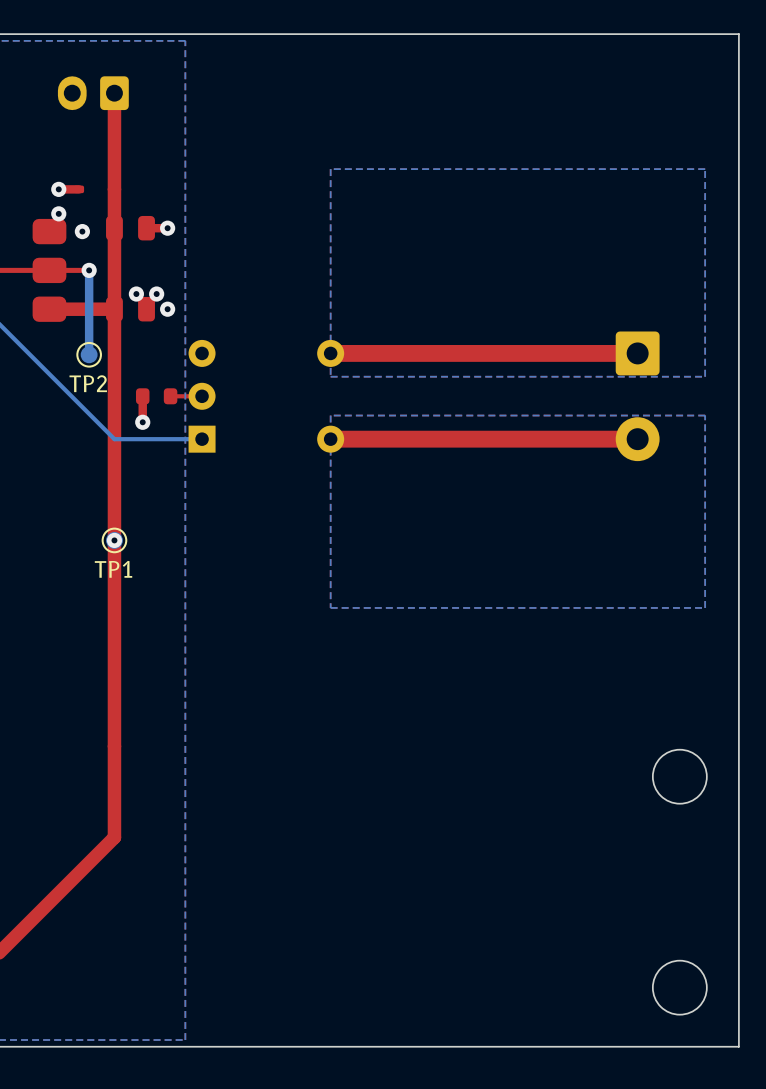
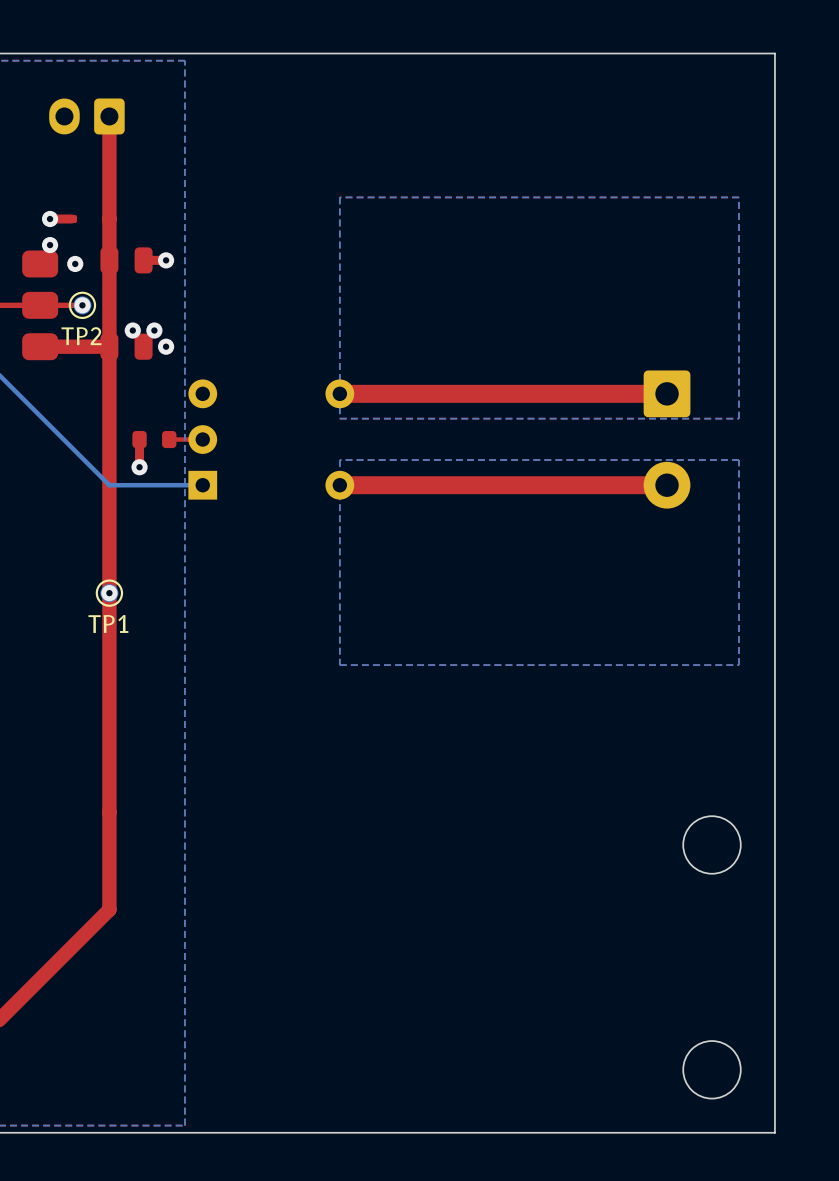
bottom track: (89, 270) (89, 354) -> none
TP2 position: (89, 354) -> (82, 305)

